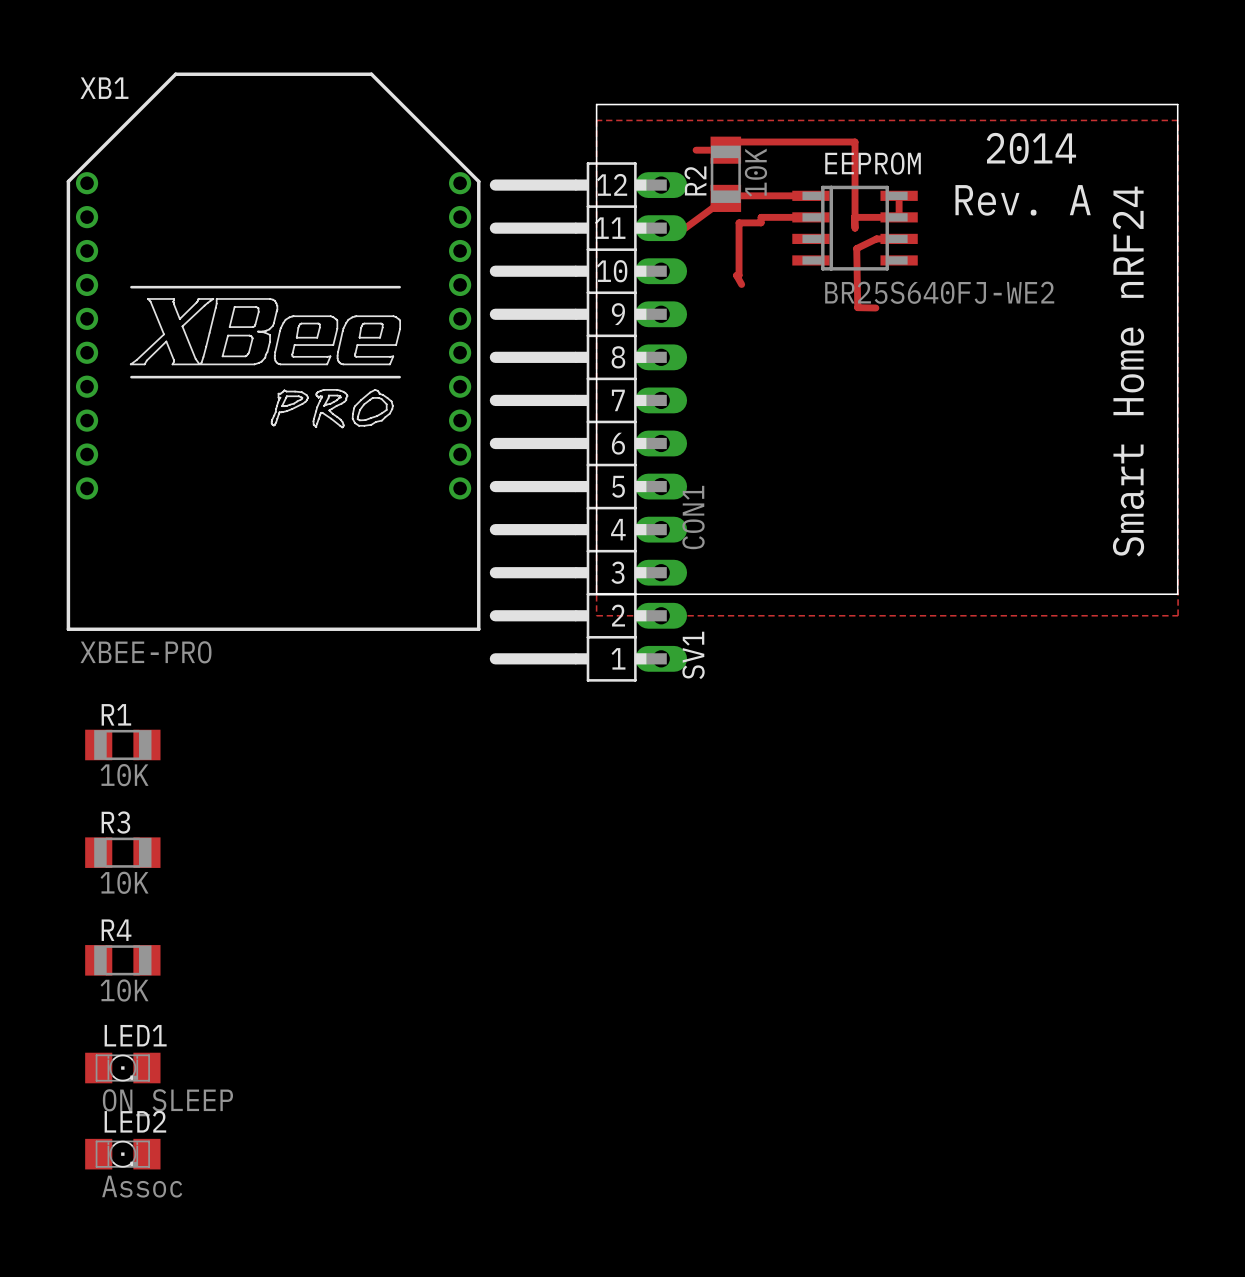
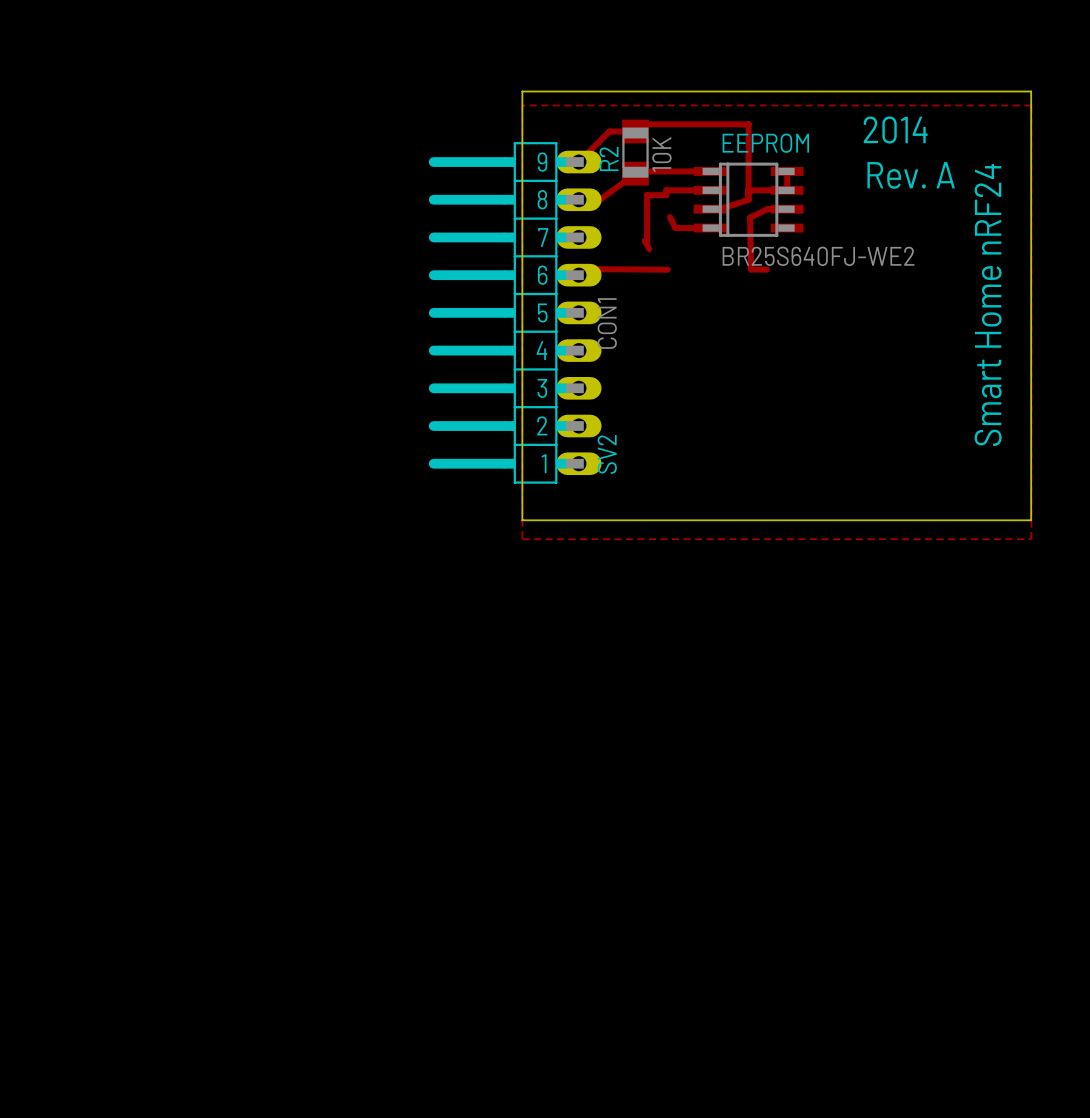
top track: none -> (609, 131) (578, 162)
top track: none -> (748, 199) (720, 209) (710, 209)
top track: none -> (669, 217) (675, 228) (710, 228)
top track: none -> (667, 269) (598, 269) (578, 275)
XB1: XBEE-PRO (273, 351) -> none
SV2: none -> CON1 (515, 312)
SV1: CON1 (588, 421) -> none
R1: 10K (122, 744) -> none
R3: 10K (122, 852) -> none
R4: 10K (122, 960) -> none
LED1: ON_SLEEP (122, 1068) -> none
LED2: Assoc (122, 1154) -> none

